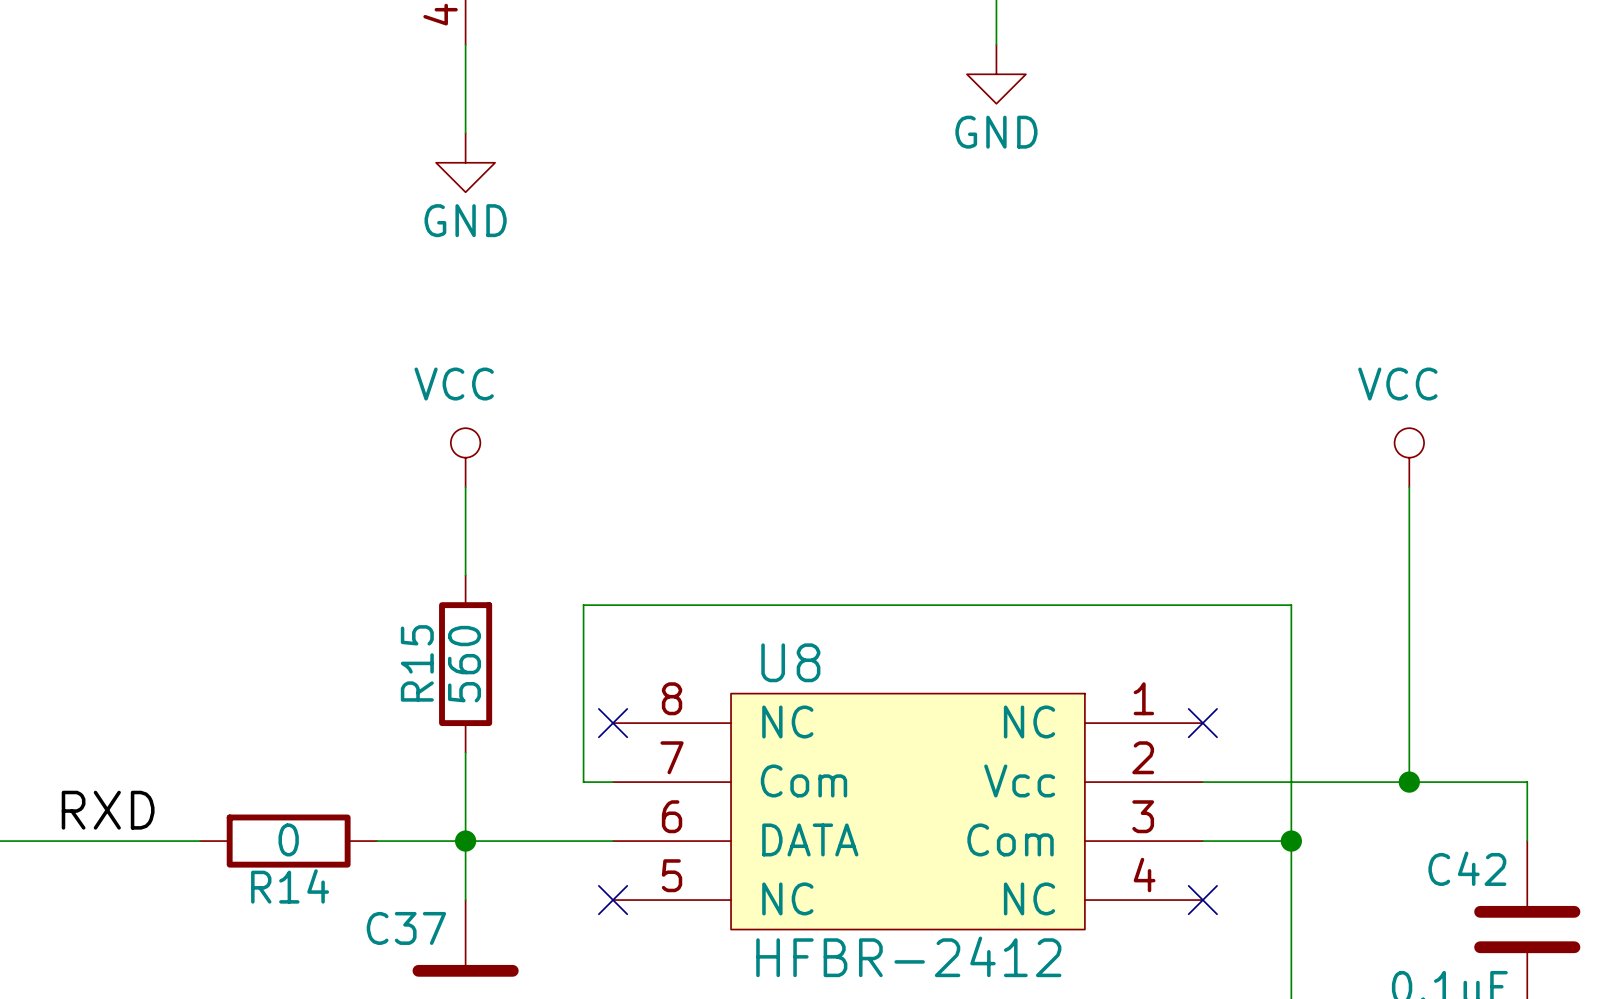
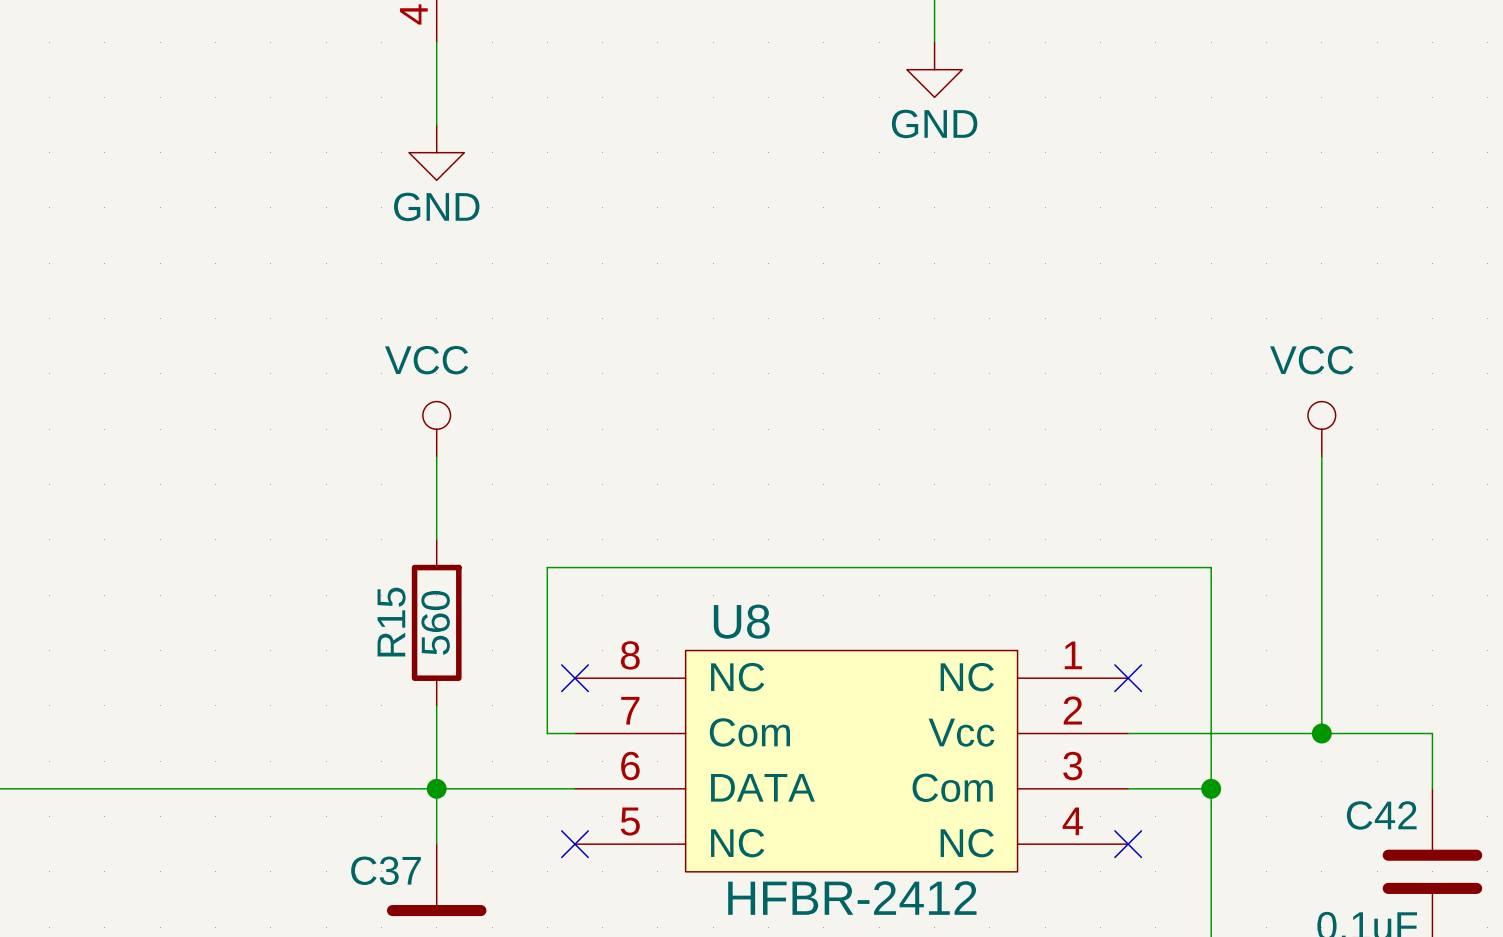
label: RXD (108, 810) -> none
wire: none -> (187, 788) (353, 788)
R14: 0 (288, 841) -> none

